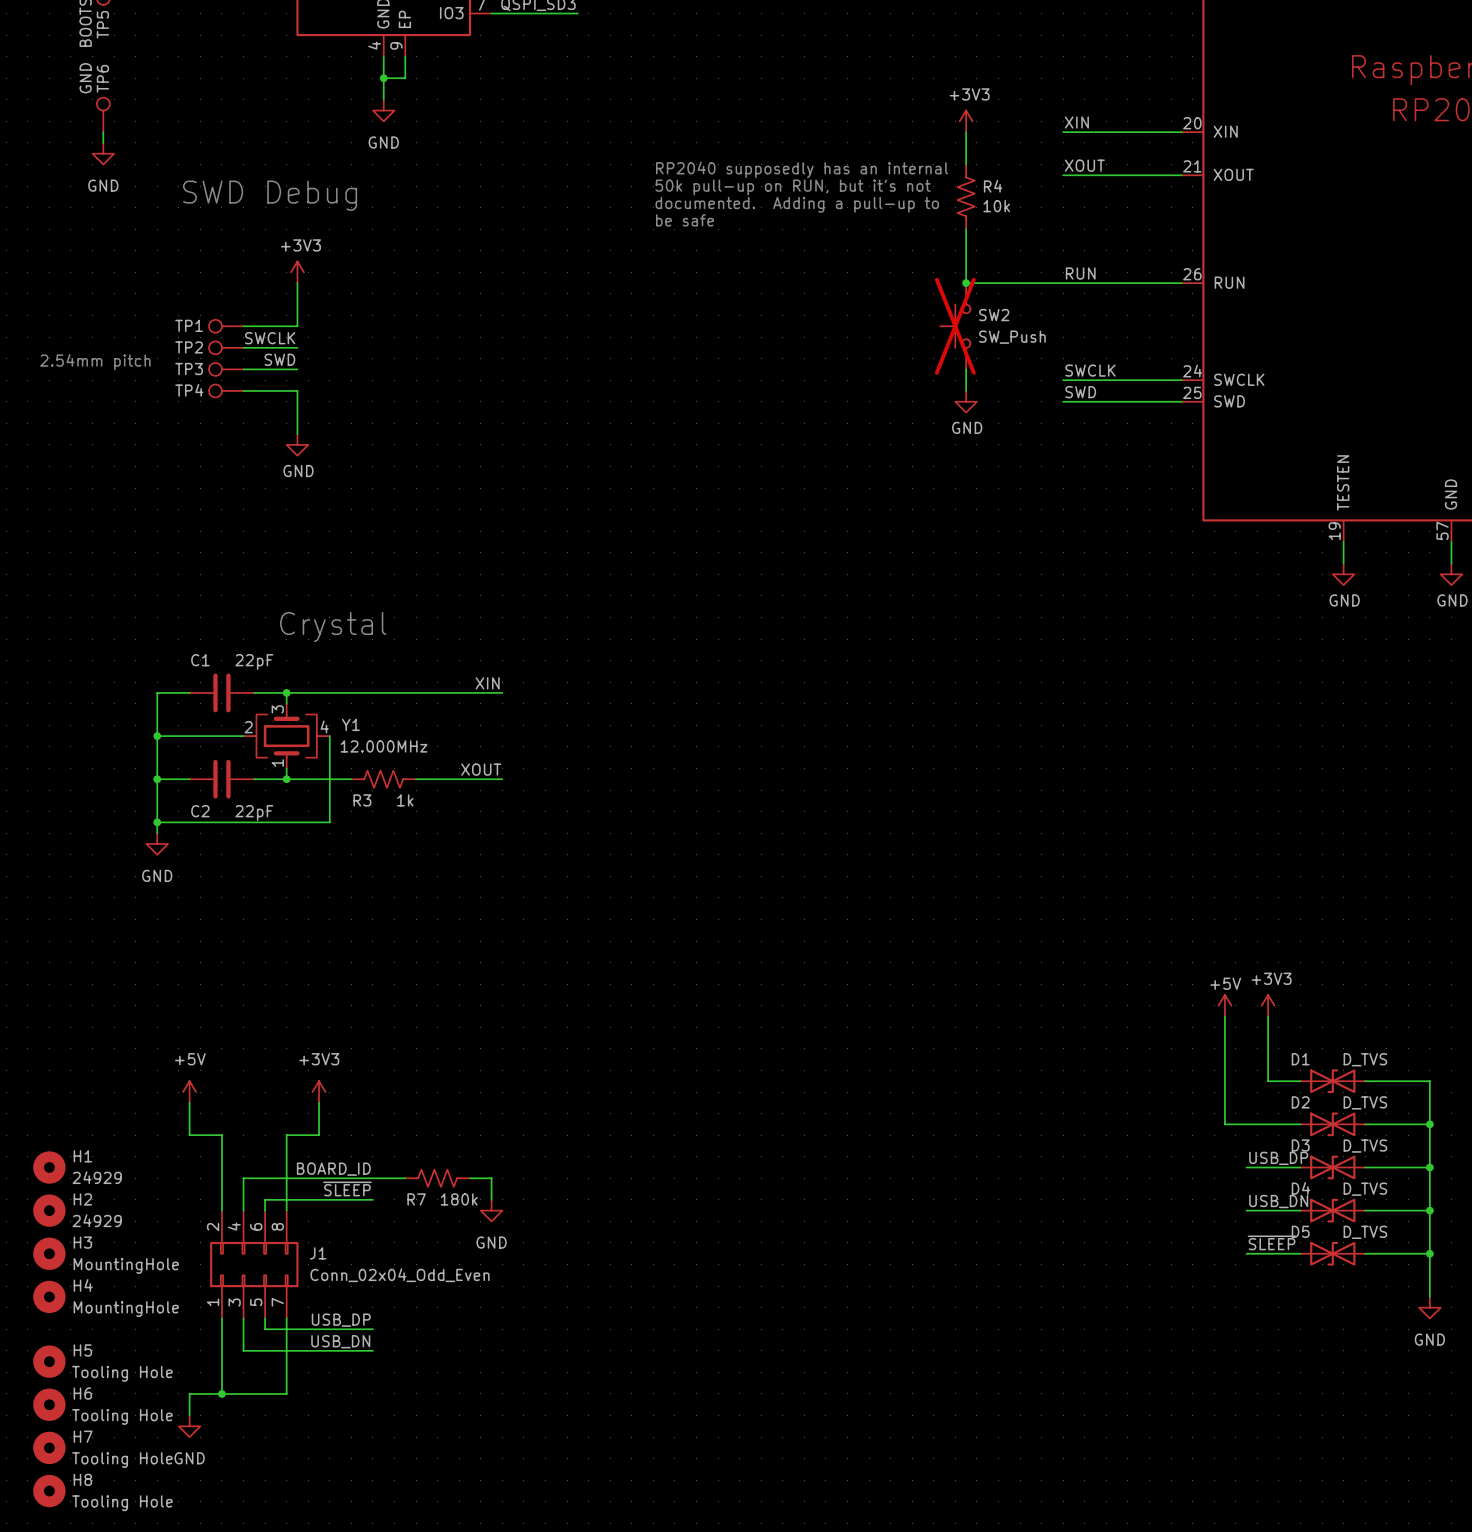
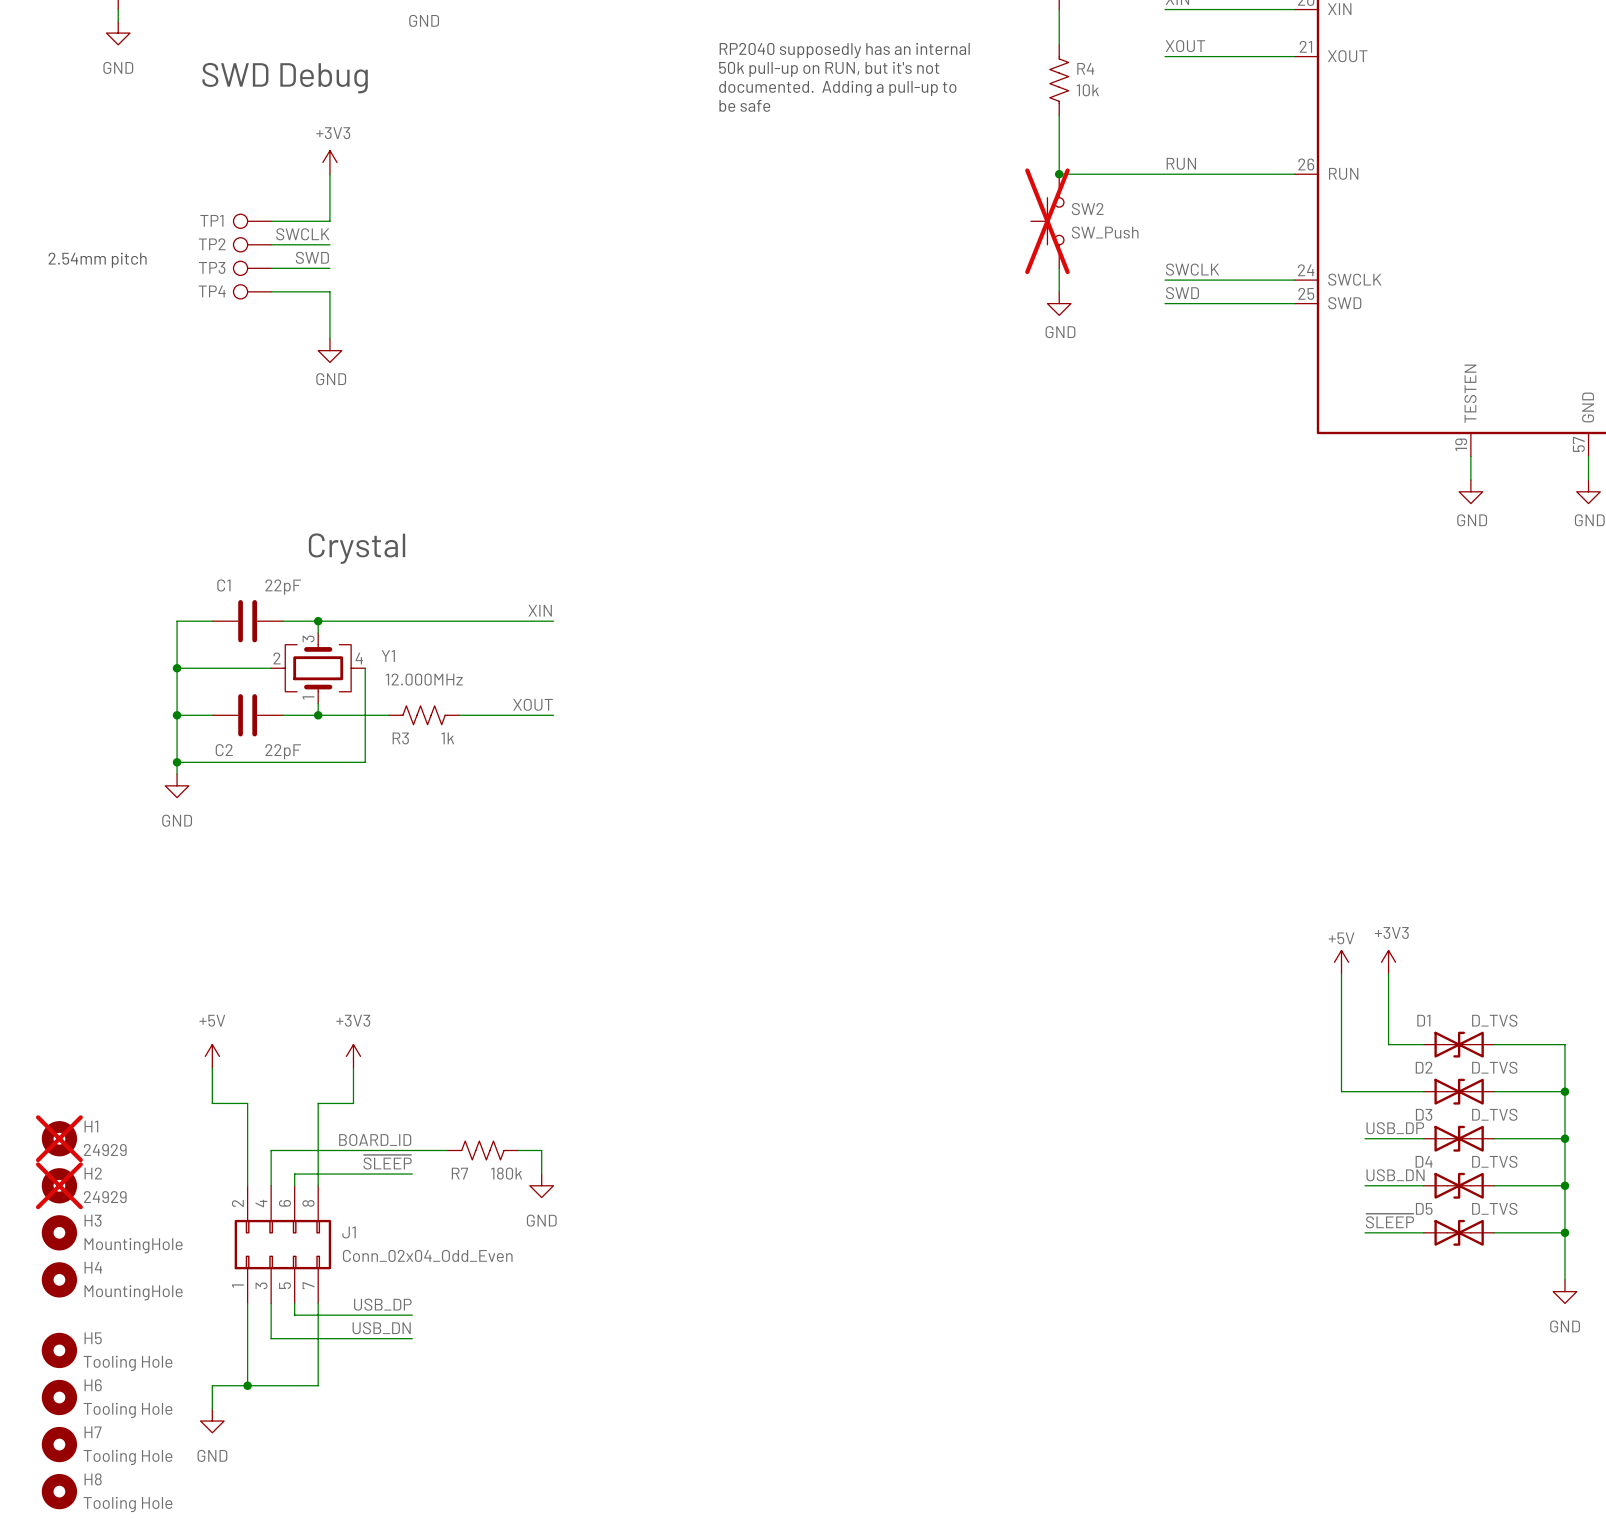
H1 do-not-place cross: none -> (59, 1138)
H2 do-not-place cross: none -> (59, 1185)

